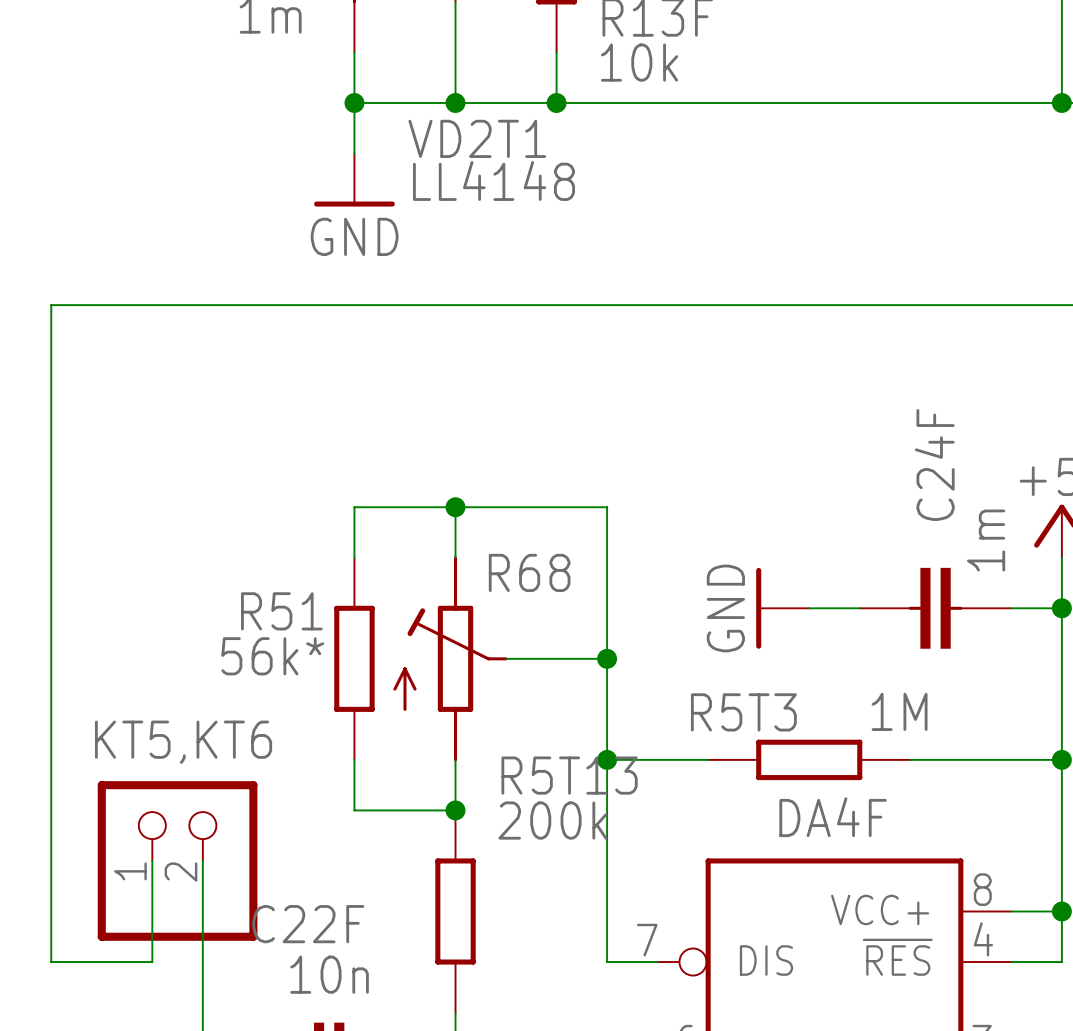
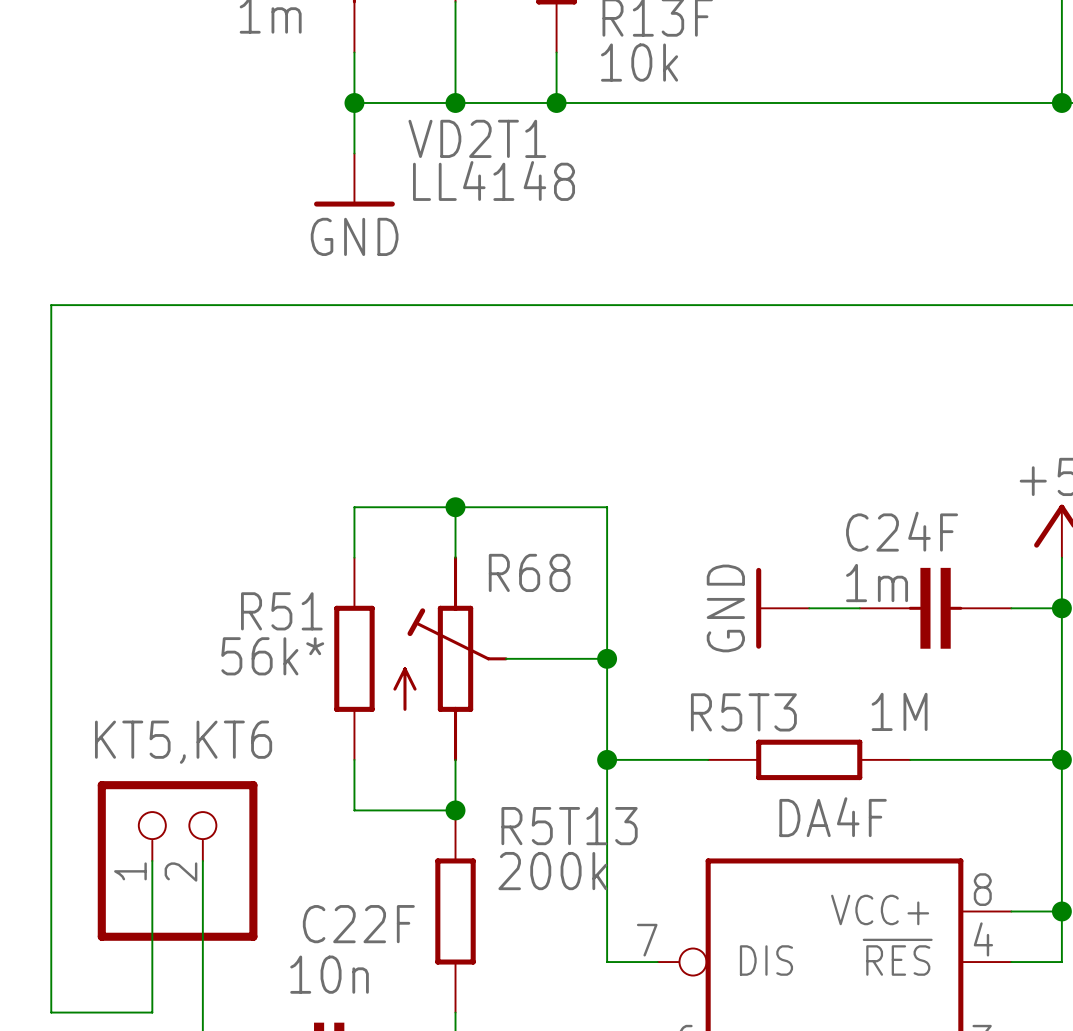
C24F name rotation: 0° (934, 464) -> 90° clockwise (902, 531)
C24F value rotation: 0° (986, 540) -> 90° clockwise (877, 583)
C24F value position: 1m (986, 540) -> 1m (877, 583)
R5T13 name position: R5T13 (569, 775) -> R5T13 (569, 826)
R5T13 value position: 200k (552, 820) -> 200k (552, 871)
C22F name position: C22F (308, 924) -> C22F (358, 924)
wire: (51, 962) (152, 962) -> (51, 962) (51, 1012) (152, 1012) (152, 962)

